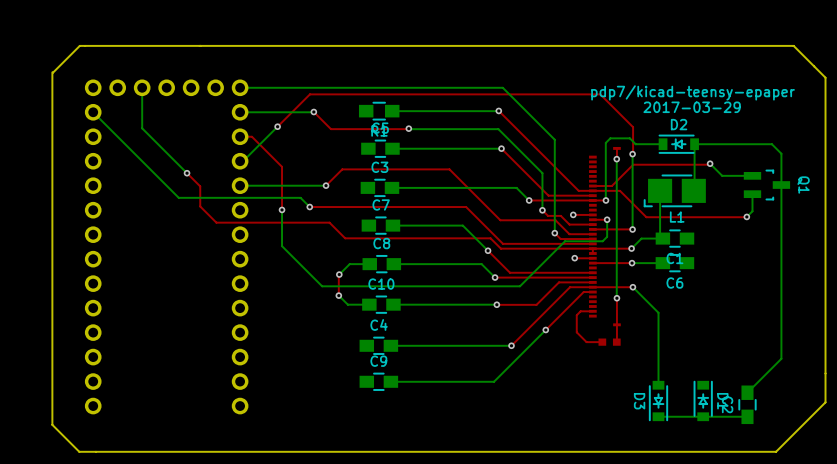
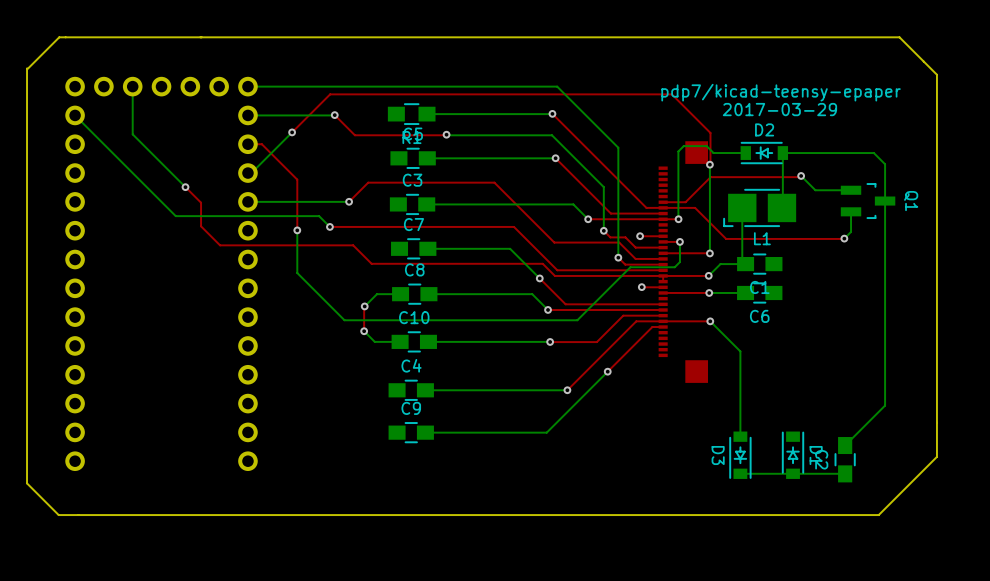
part footprint: [589, 146, 621, 327] -> [658, 141, 709, 383]
top track: (616, 148) (616, 159) -> none
bottom track: (616, 159) (616, 298) -> none
via: (616, 159) -> none
top track: (616, 298) (616, 342) -> none
via: (616, 298) -> none
top track: (592, 311) (580, 311) (576, 315) (576, 332) (586, 342) (602, 342) -> none
part: (609, 342) -> none

